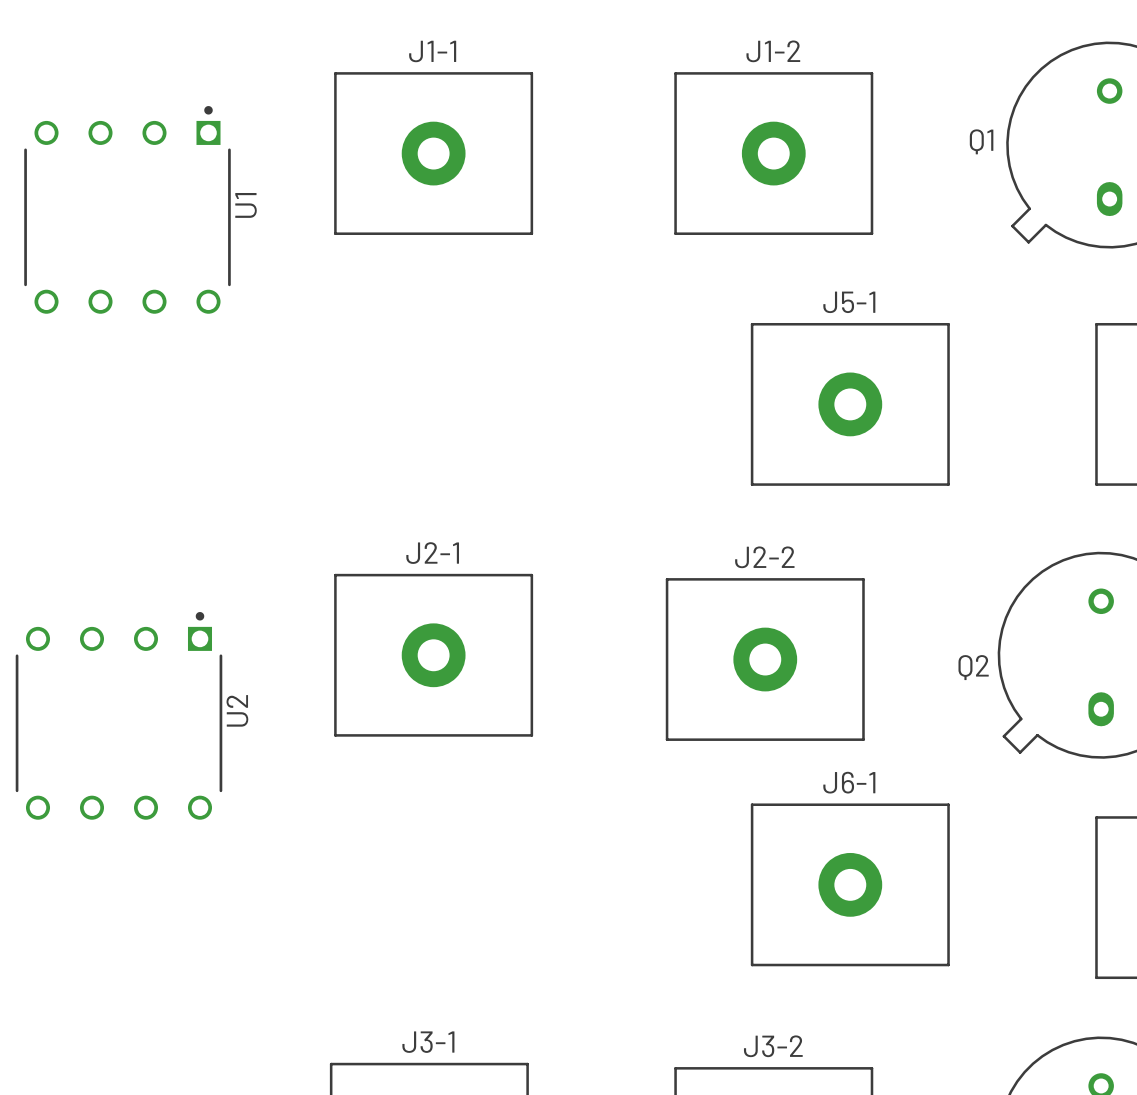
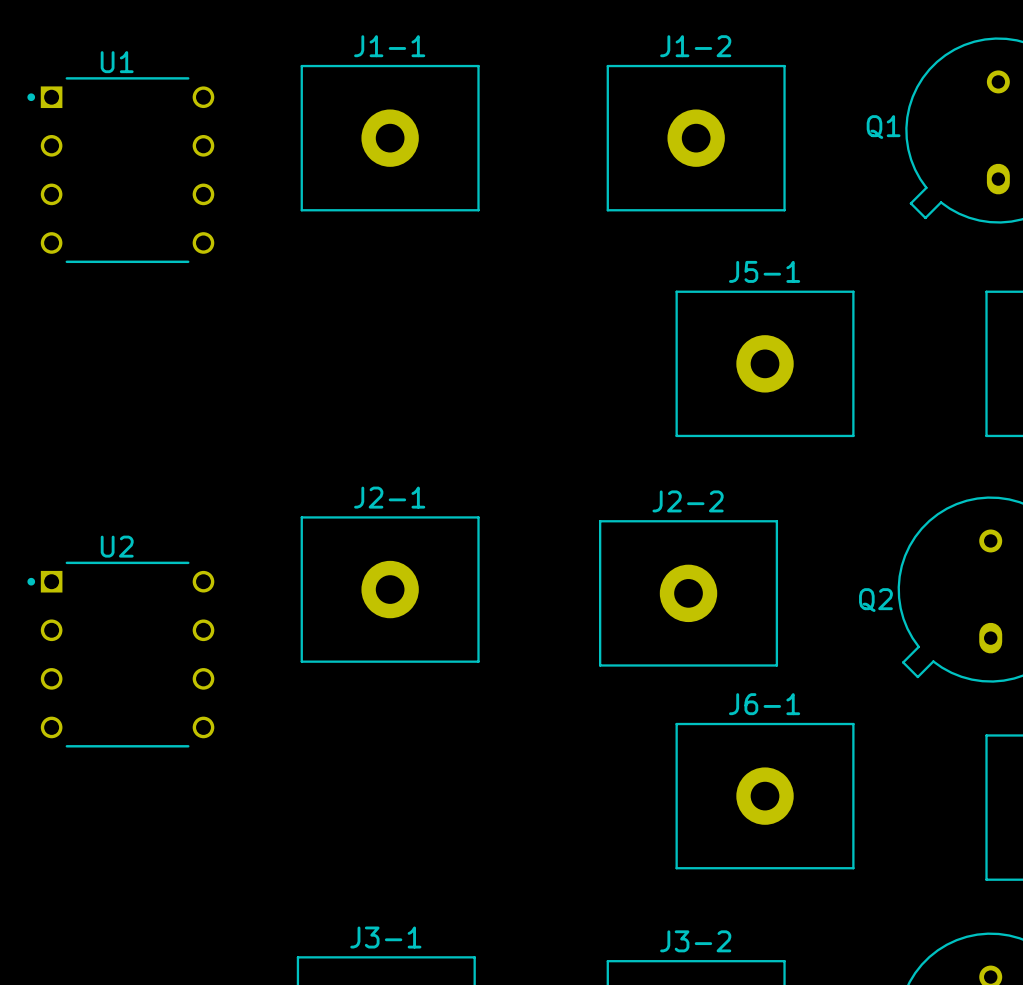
U1 rotation: 0° (127, 209) -> 90° counterclockwise (120, 170)
U2 rotation: 0° (118, 715) -> 90° counterclockwise (120, 654)

